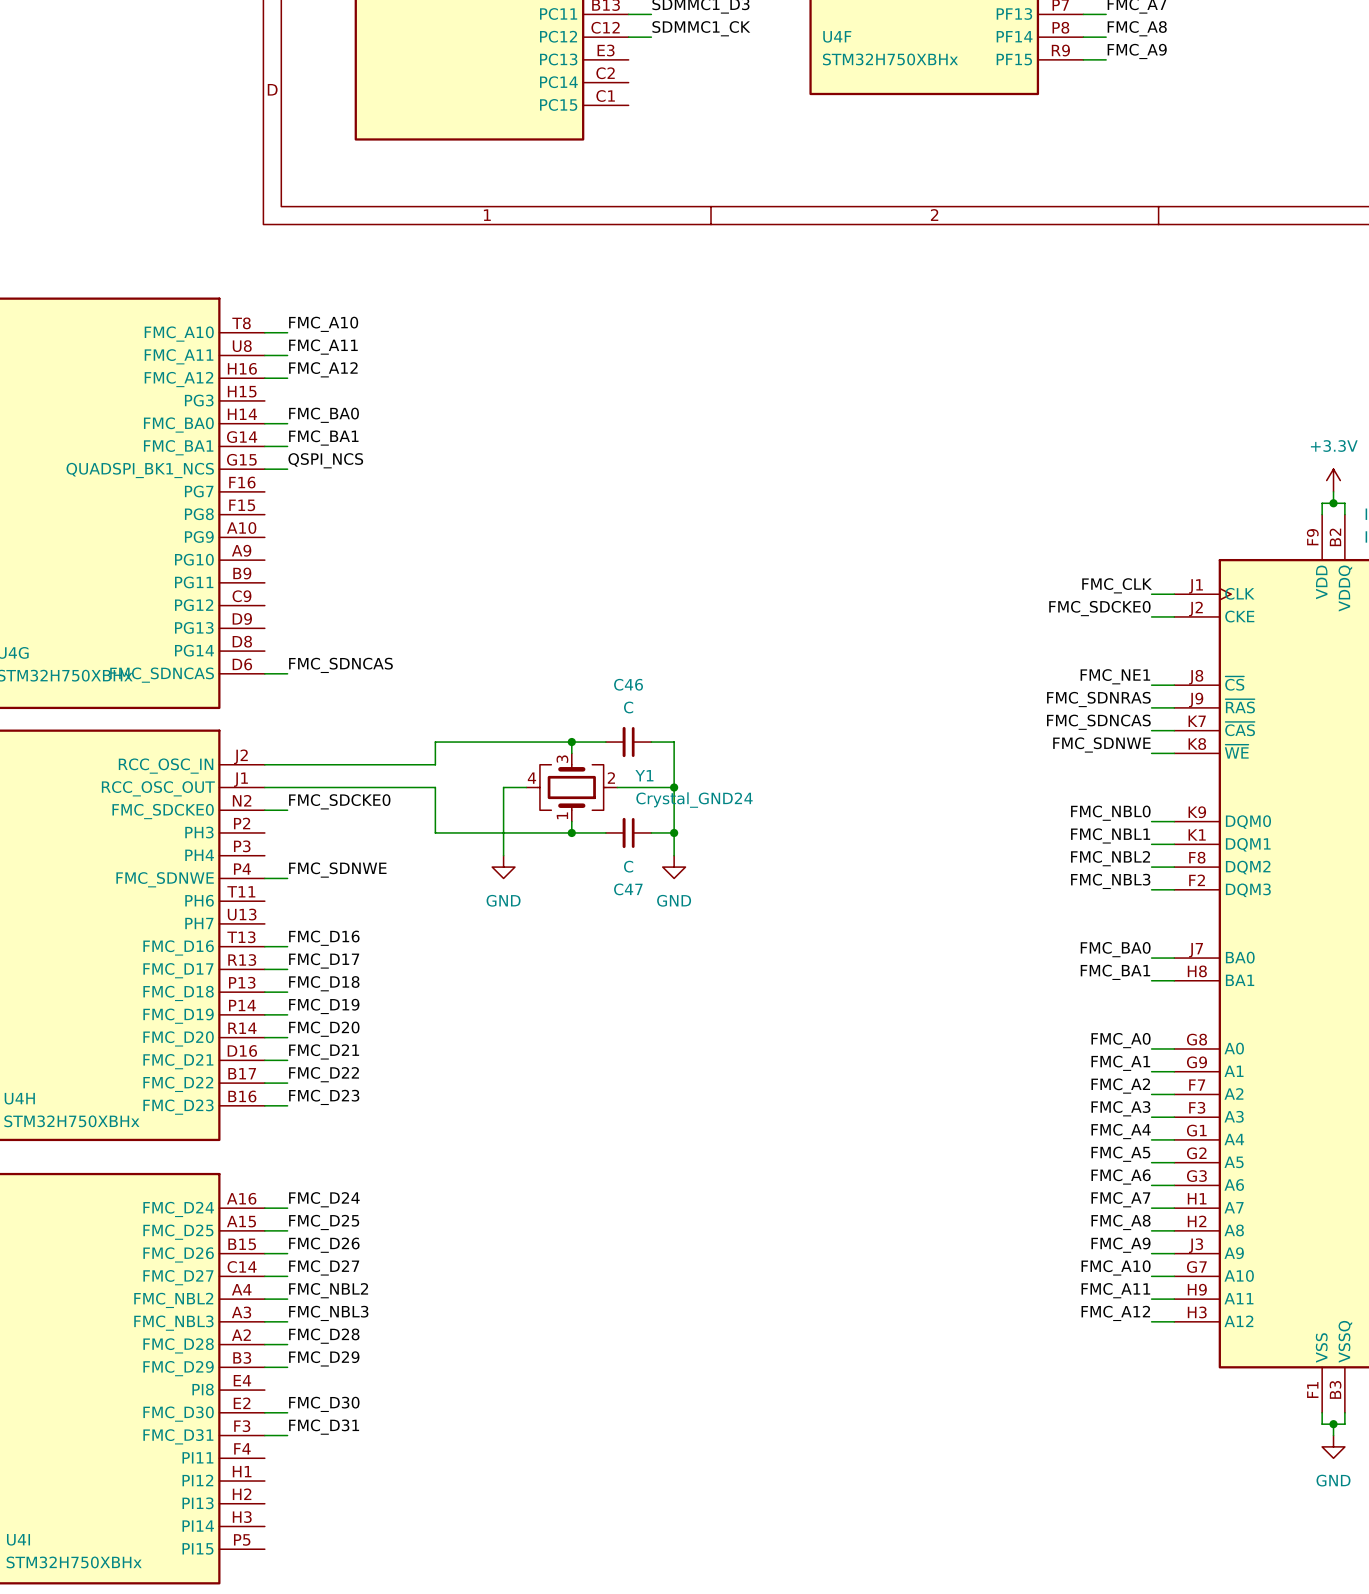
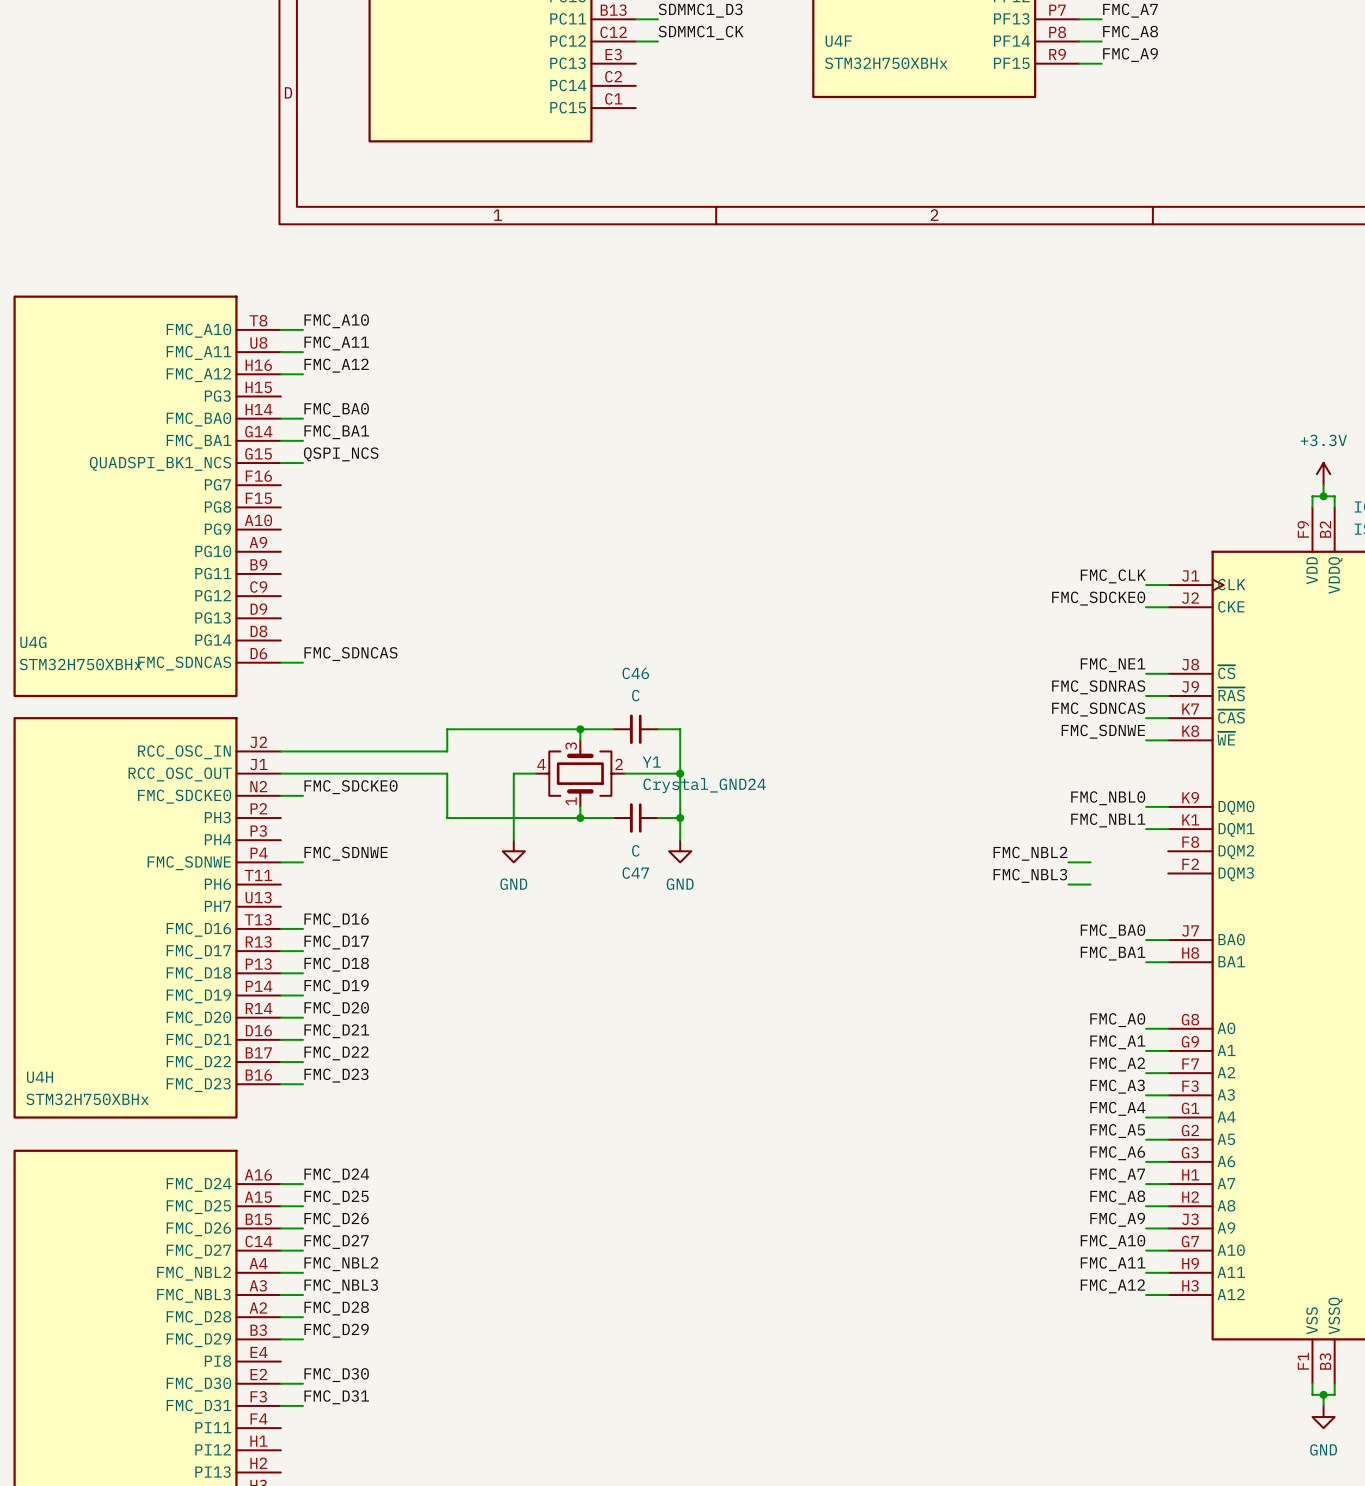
label position: FMC_NBL2 (1110, 858) -> FMC_NBL2 (1030, 853)
wire: (1151, 867) (1174, 867) -> (1068, 884) (1090, 884)
label position: FMC_NBL3 (1110, 881) -> FMC_NBL3 (1030, 875)
wire: (1151, 889) (1174, 889) -> (1068, 862) (1090, 862)

